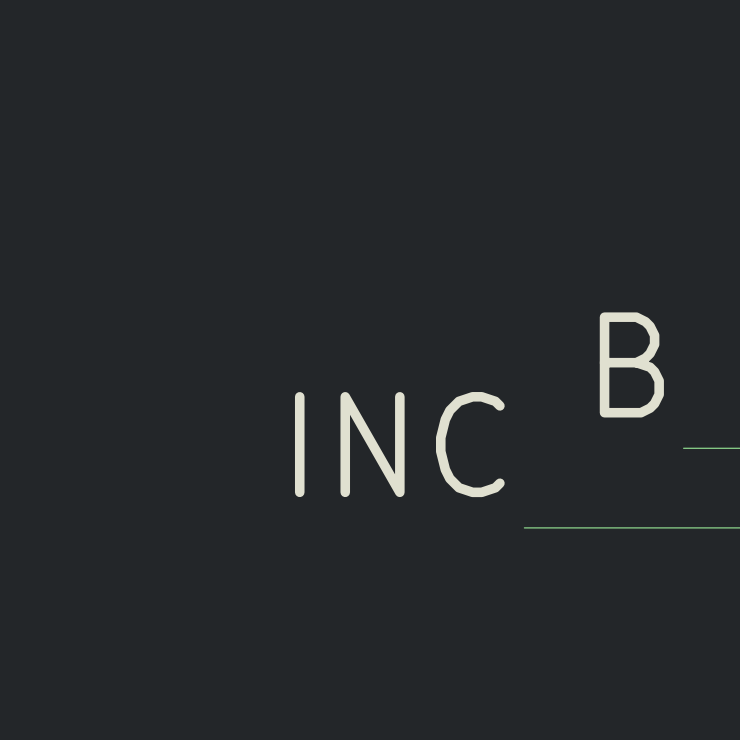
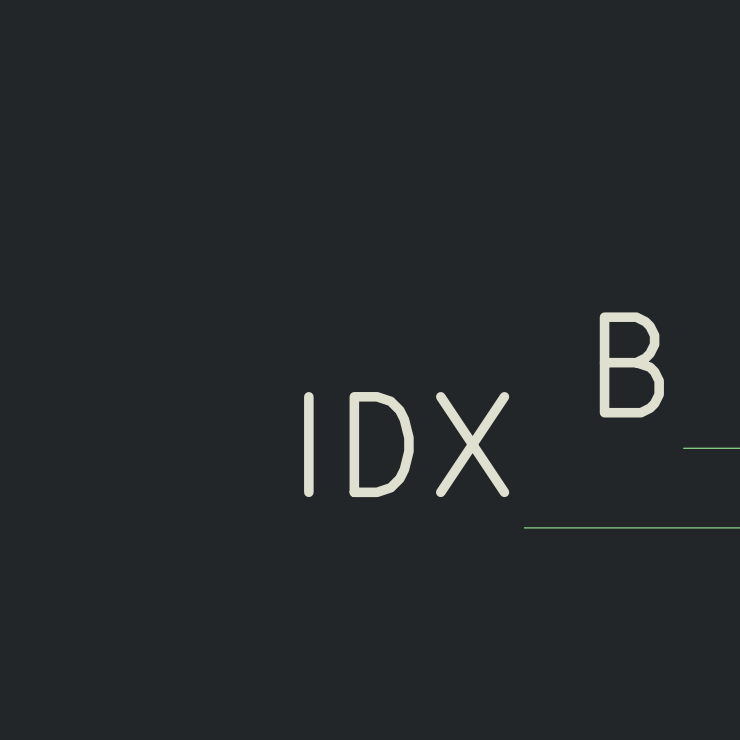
label: INC (399, 444) -> IDX (406, 444)

